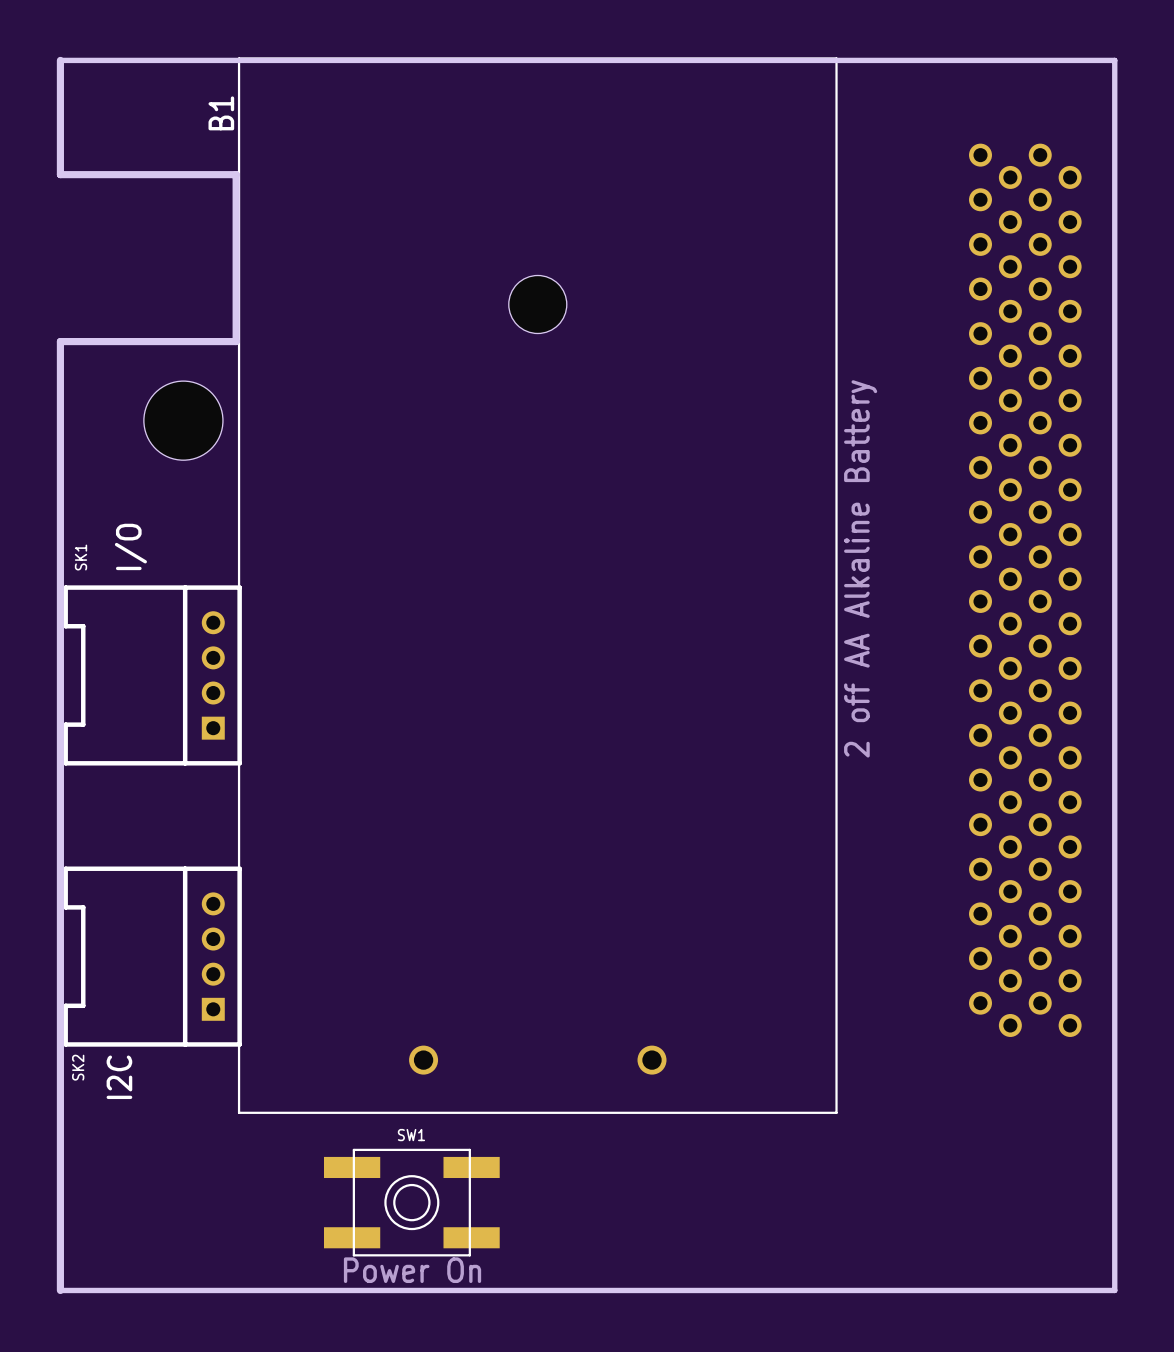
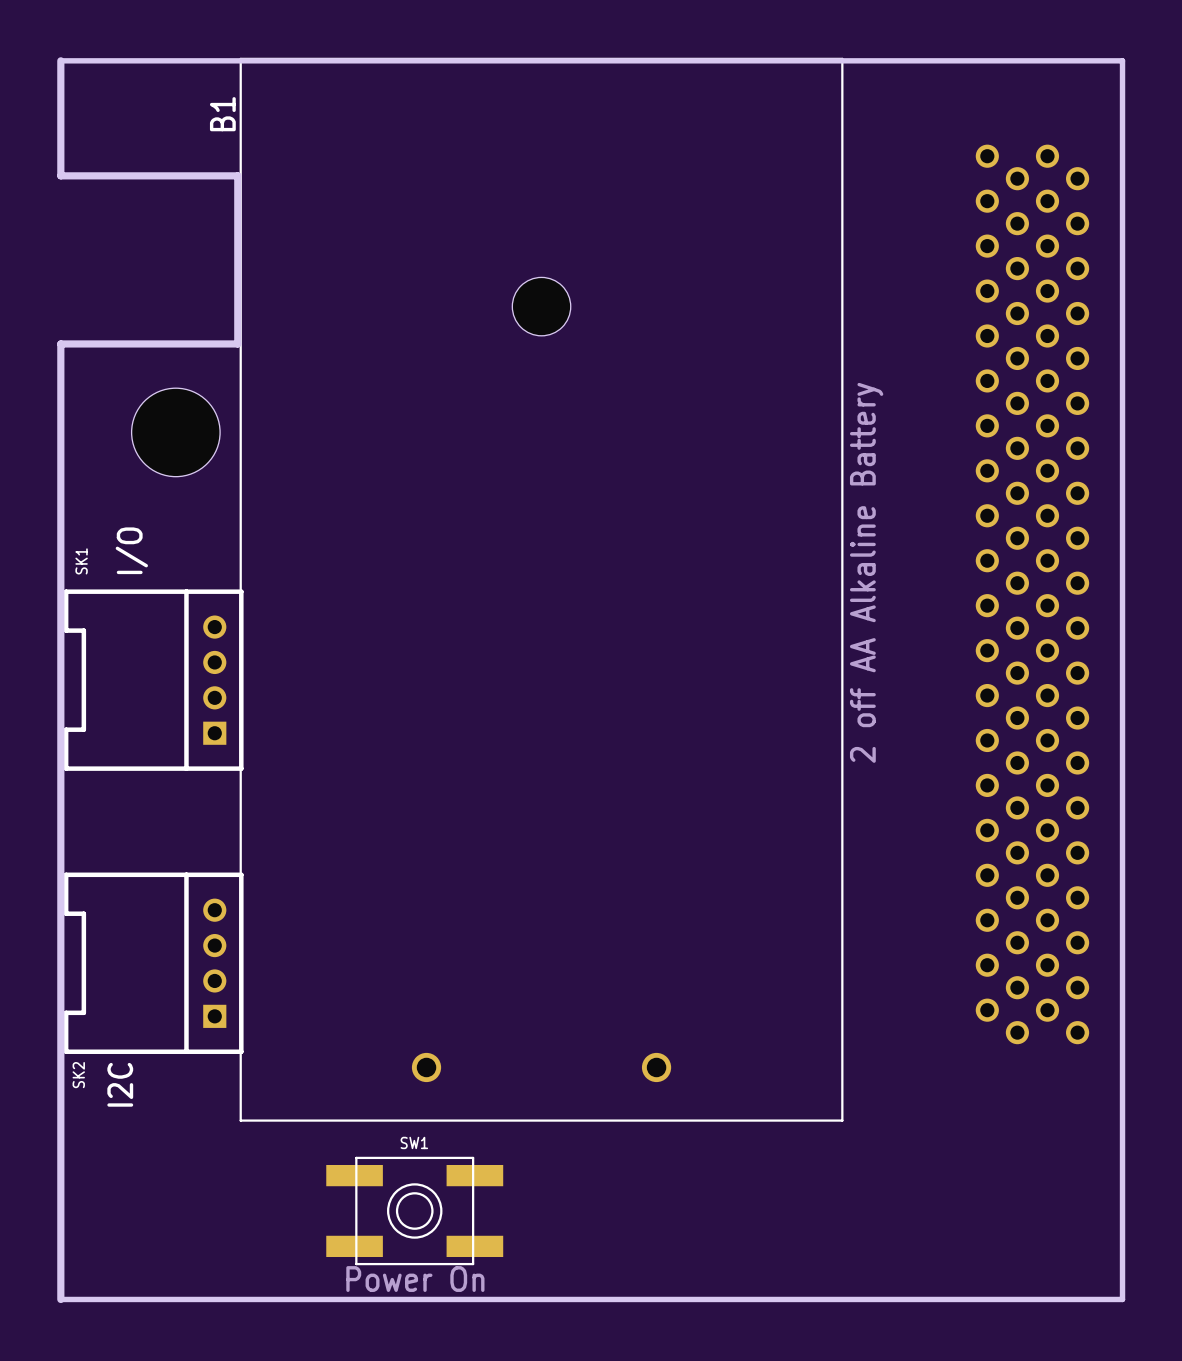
hole size: [143, 381, 223, 461] -> [131, 388, 221, 477]

